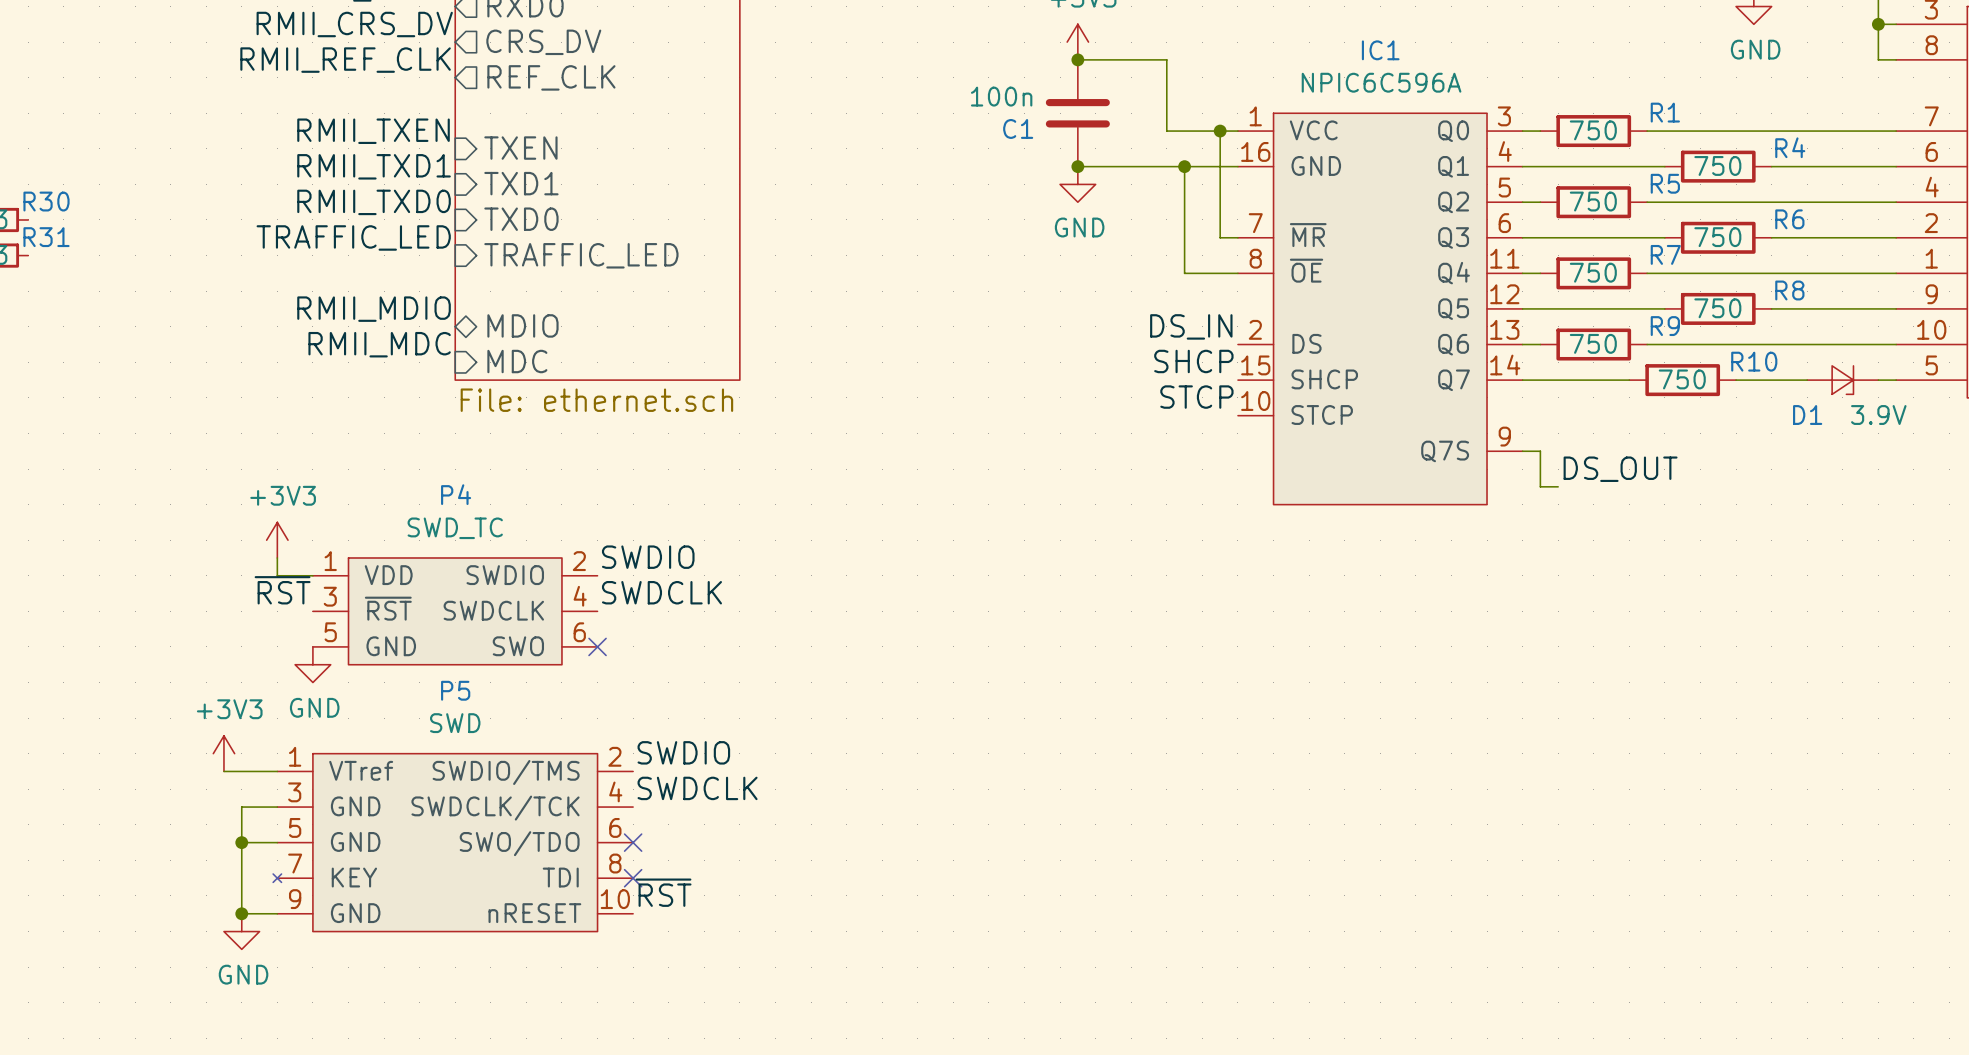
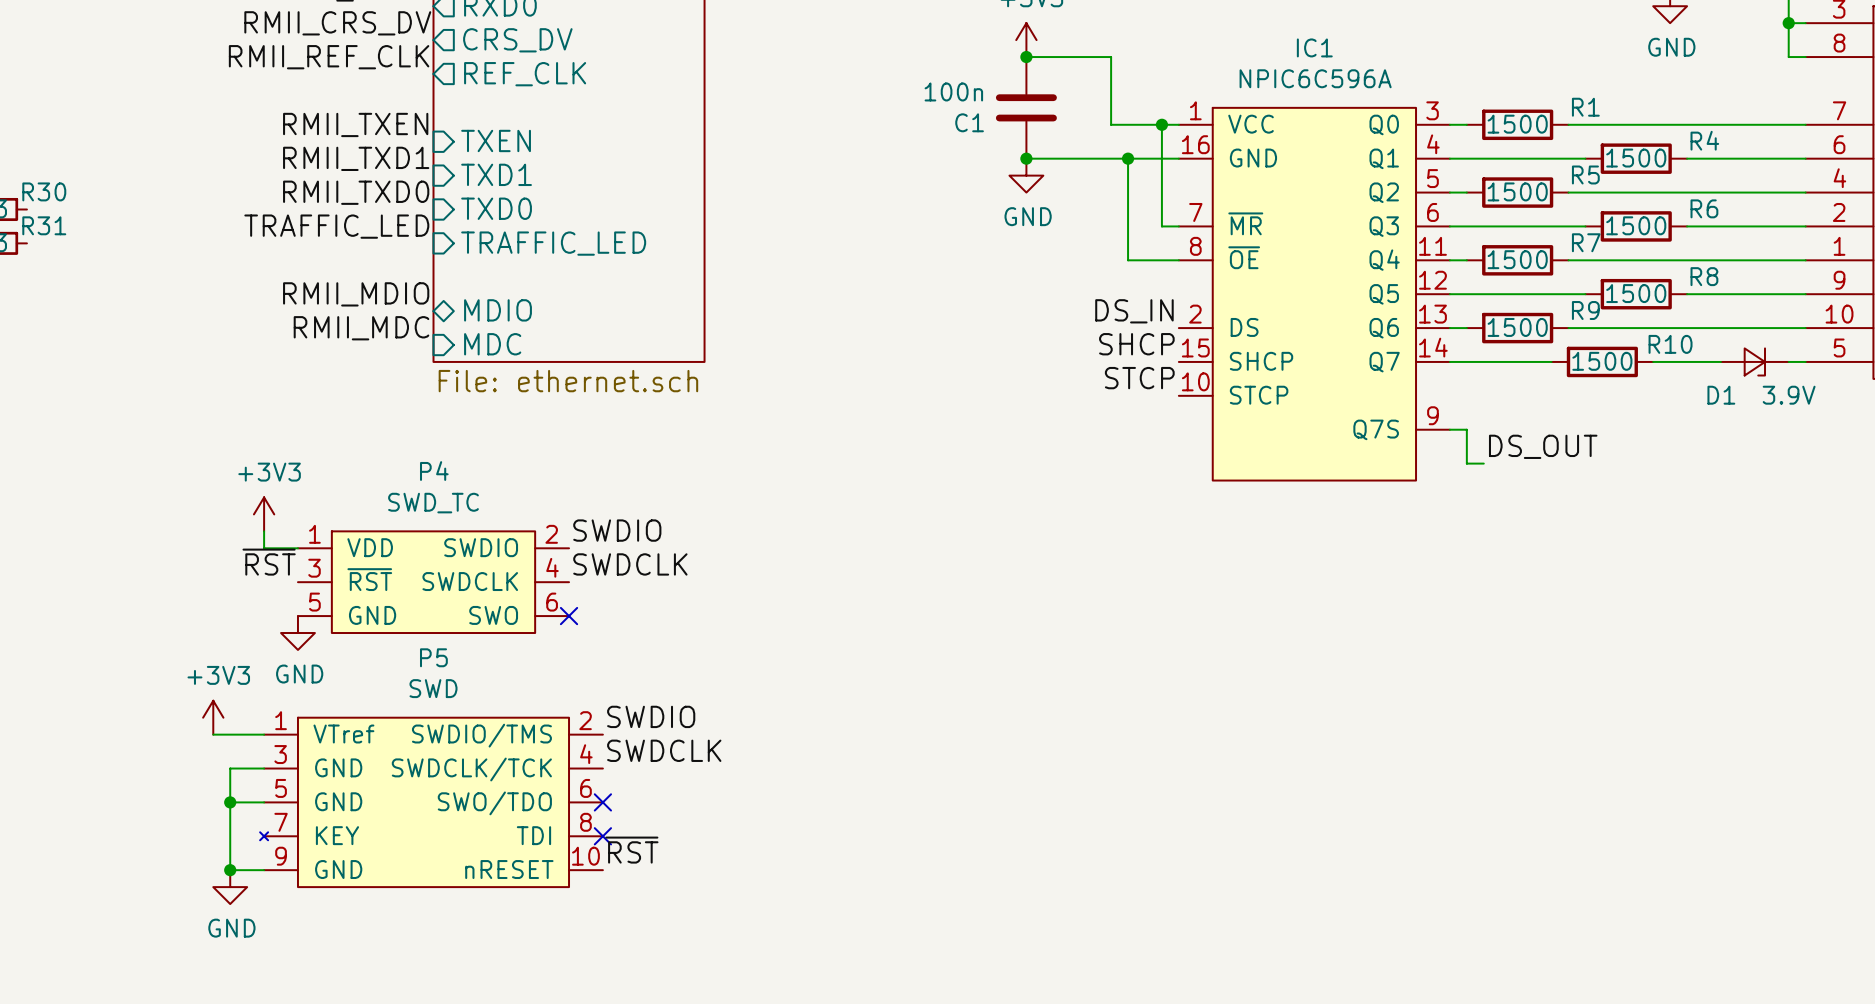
R1 value: 750 (1593, 130) -> 1500 (1517, 124)
R4 value: 750 (1717, 165) -> 1500 (1636, 158)
R5 value: 750 (1593, 201) -> 1500 (1517, 191)
R6 value: 750 (1717, 237) -> 1500 (1636, 225)
R7 value: 750 (1593, 272) -> 1500 (1517, 259)
R8 value: 750 (1717, 308) -> 1500 (1636, 293)
R9 value: 750 (1593, 343) -> 1500 (1517, 327)
R10 value: 750 (1682, 379) -> 1500 (1602, 361)

